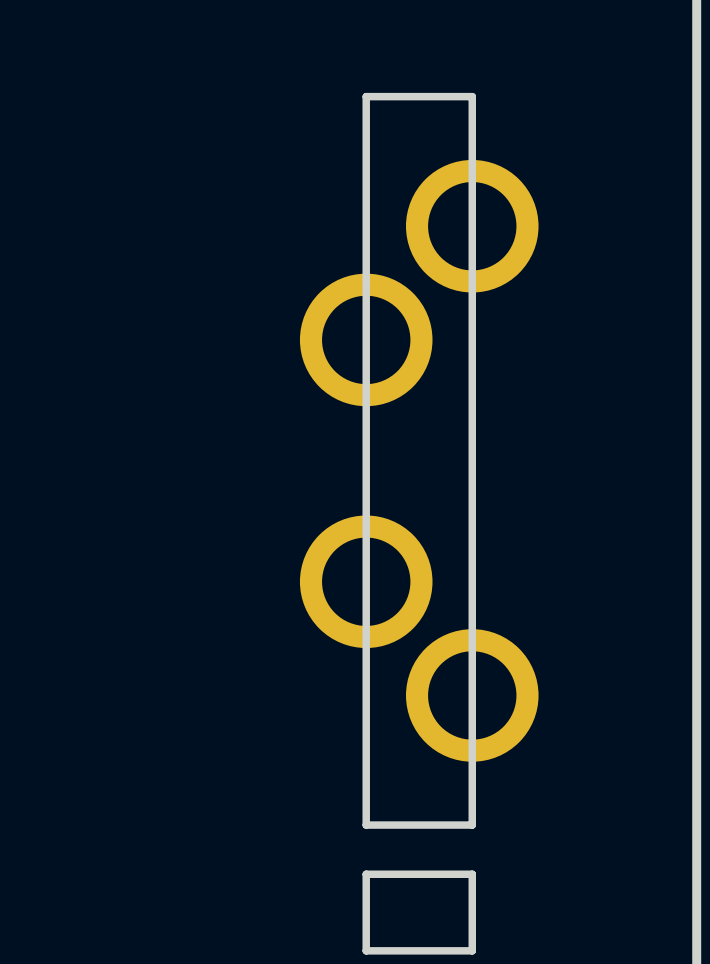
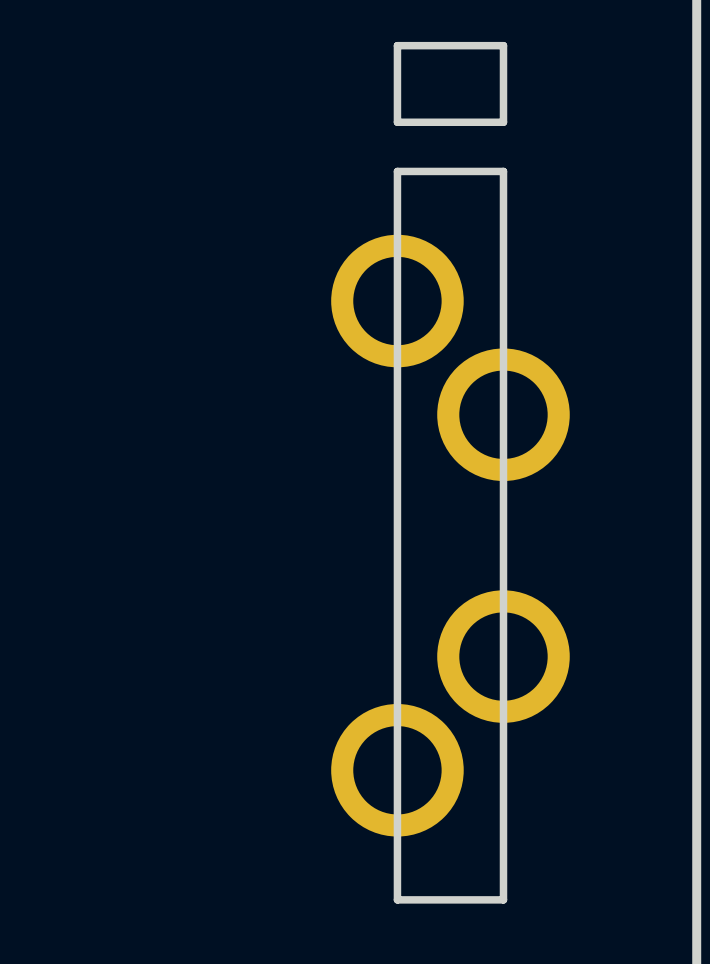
part rotation: 0° (419, 523) -> 180° (450, 472)

